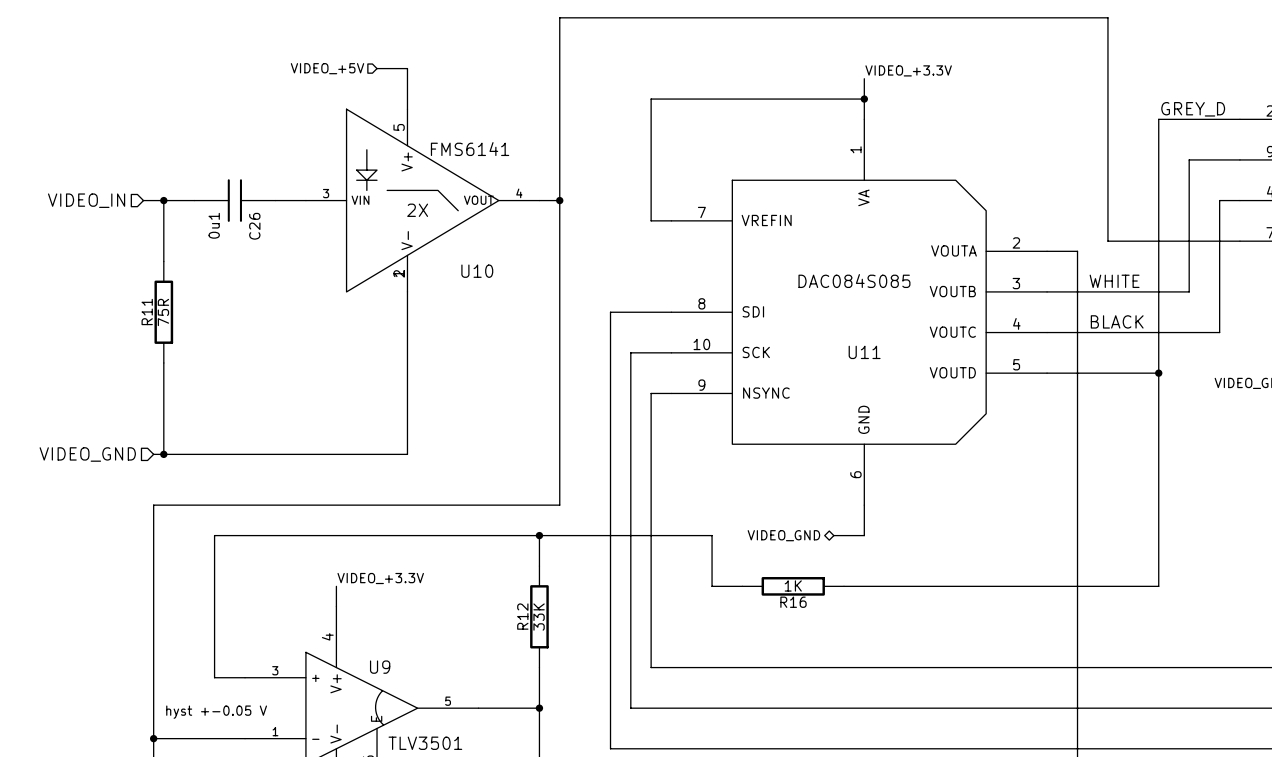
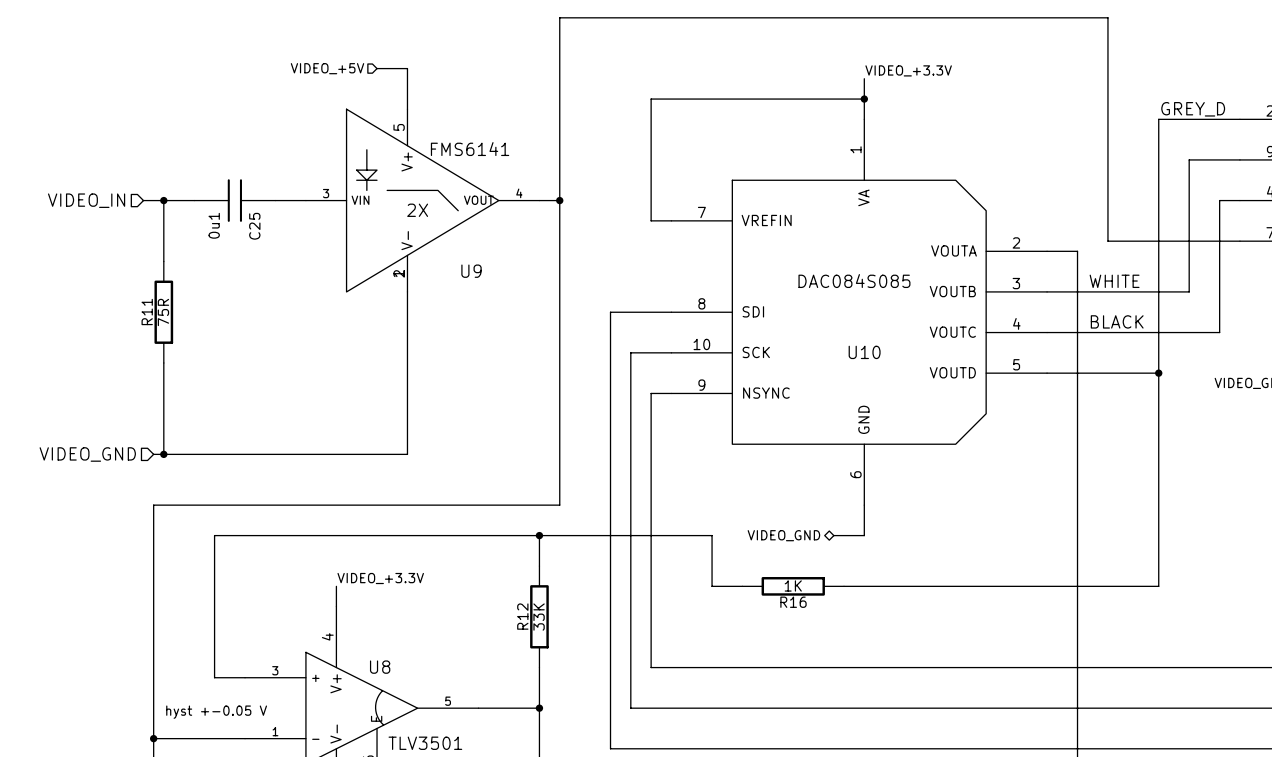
C26 name: C26 (254, 226) -> C25 (254, 226)
U10 name: U10 (477, 271) -> U9 (471, 271)
U11 name: U11 (864, 352) -> U10 (864, 352)
U9 name: U9 (380, 667) -> U8 (380, 667)

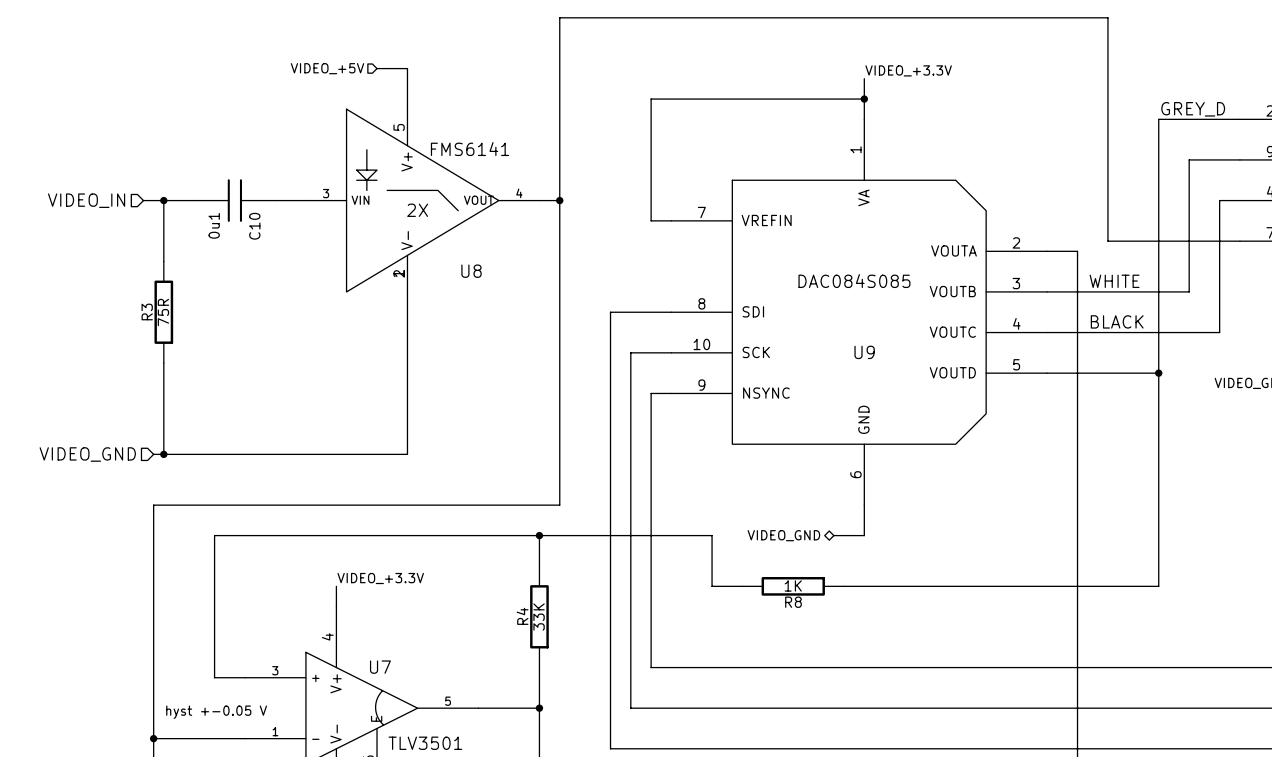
C25 name: C25 (254, 226) -> C10 (254, 226)
U9 name: U9 (471, 271) -> U8 (471, 271)
R11 name: R11 (147, 312) -> R3 (147, 312)
U10 name: U10 (864, 352) -> U9 (864, 352)
R16 name: R16 (793, 602) -> R8 (793, 602)
R12 name: R12 (522, 616) -> R4 (522, 616)
U8 name: U8 (380, 667) -> U7 (380, 667)

